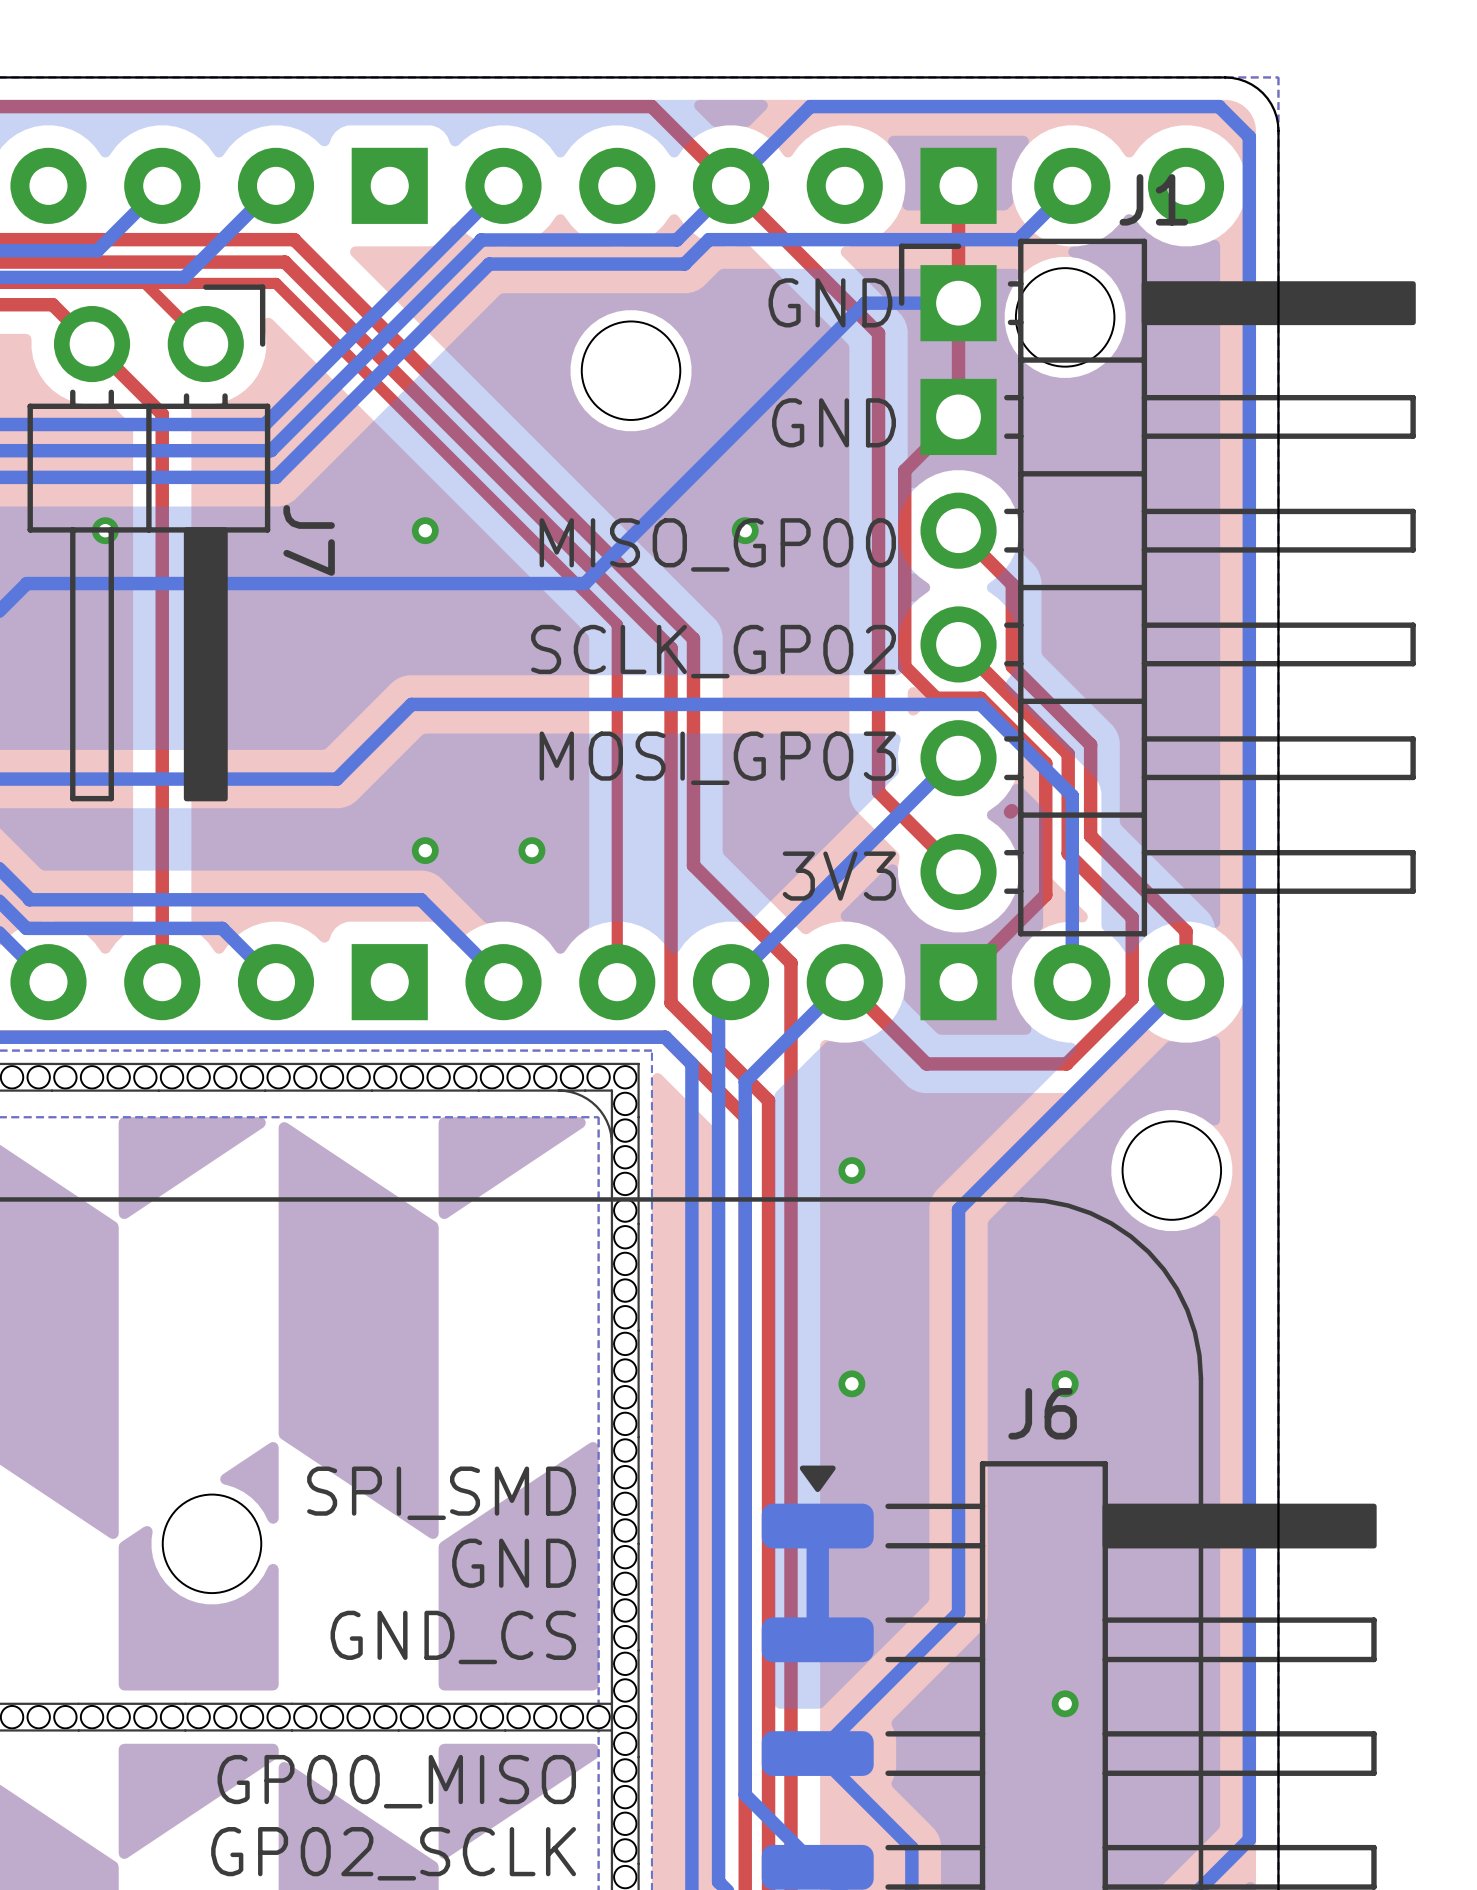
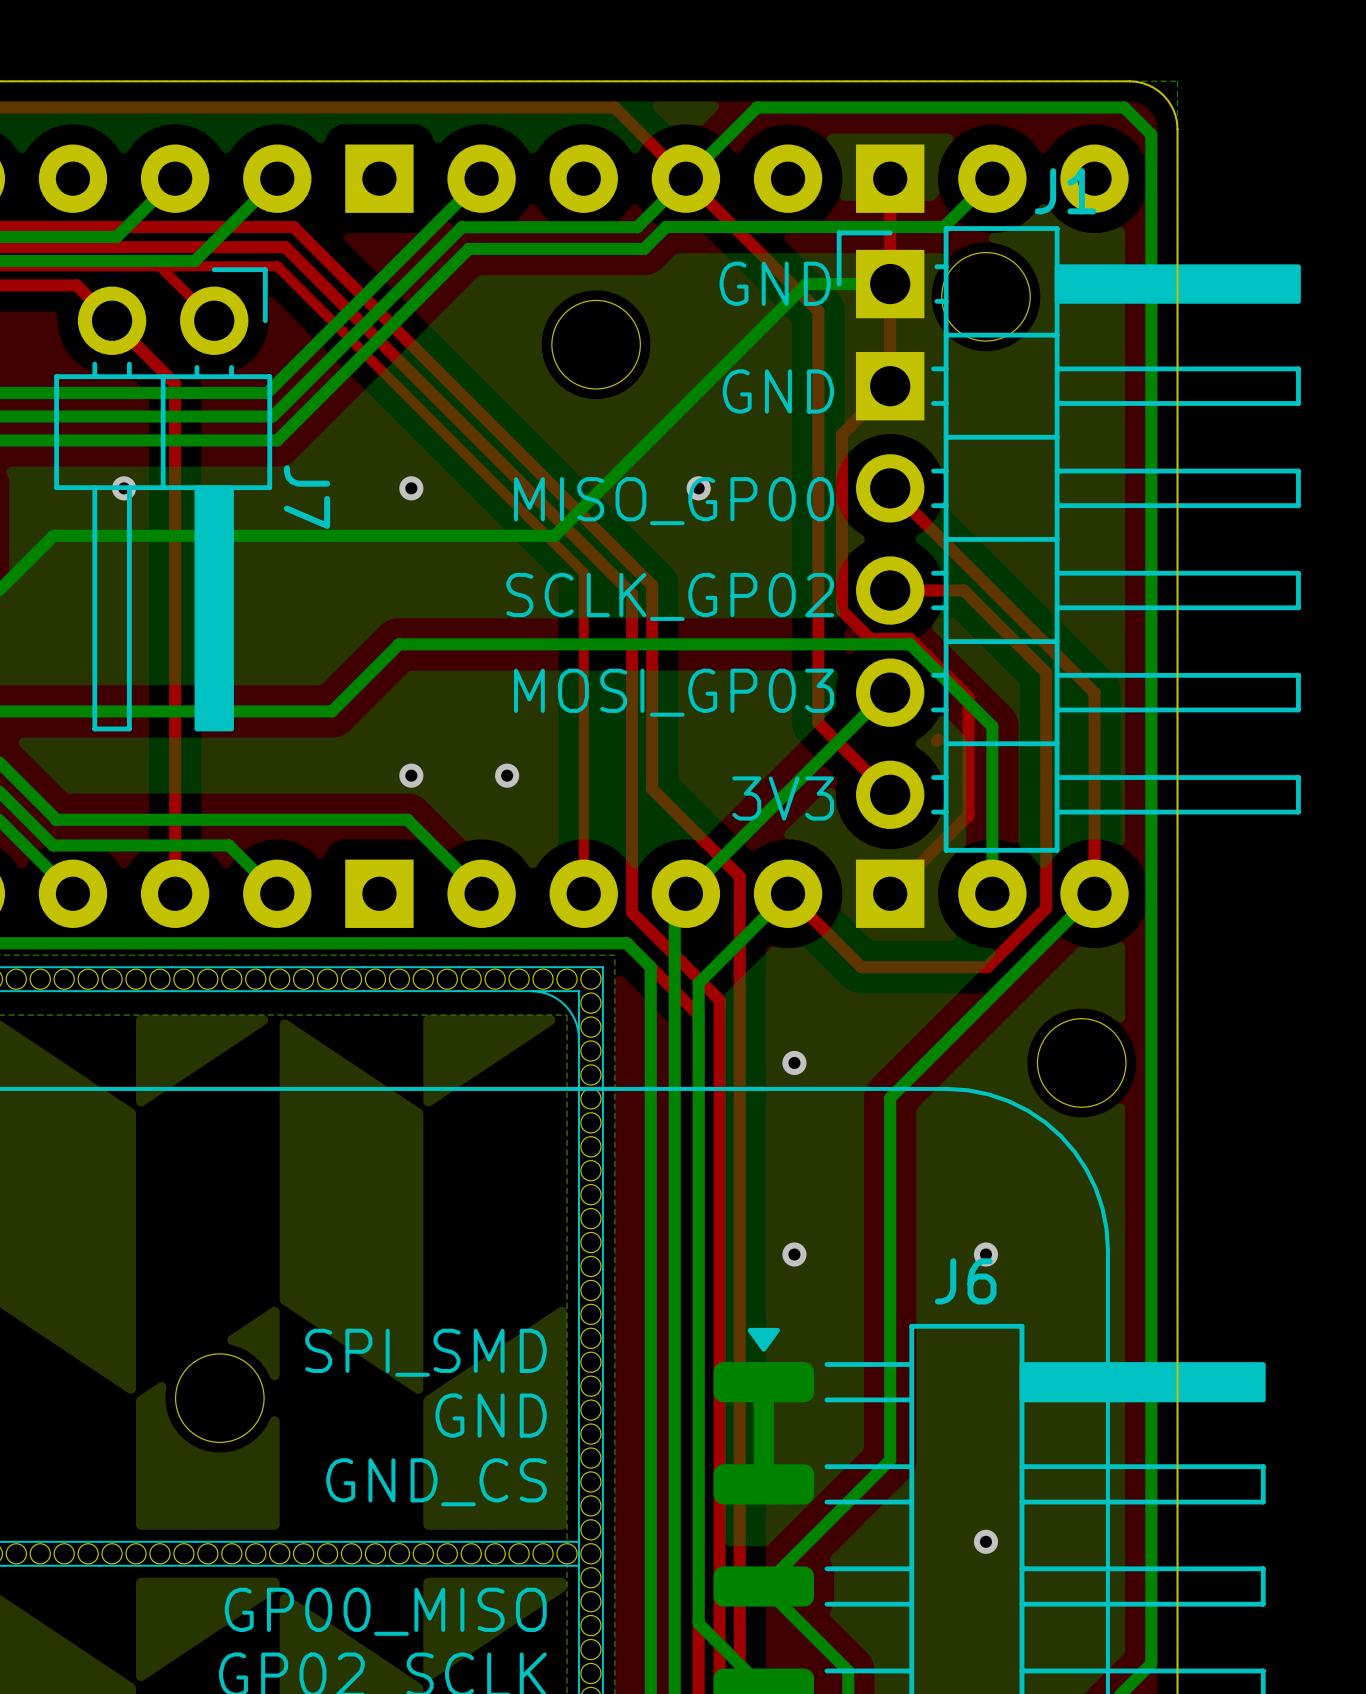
top track: (1012, 584) (1012, 666) (1090, 744) (1090, 836) (1186, 931) -> (938, 536) (1094, 692) (1094, 848)
top track: (958, 644) (1068, 754) (1068, 853) (1132, 917) -> (890, 590) (963, 590) (1046, 672) (1046, 835)

